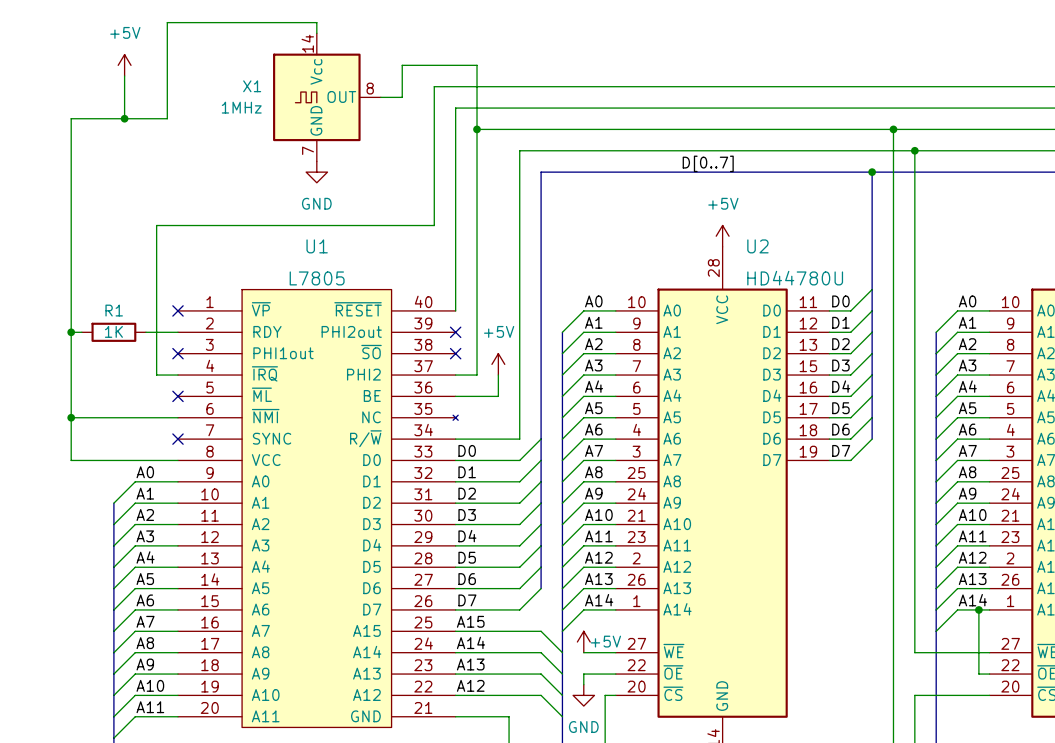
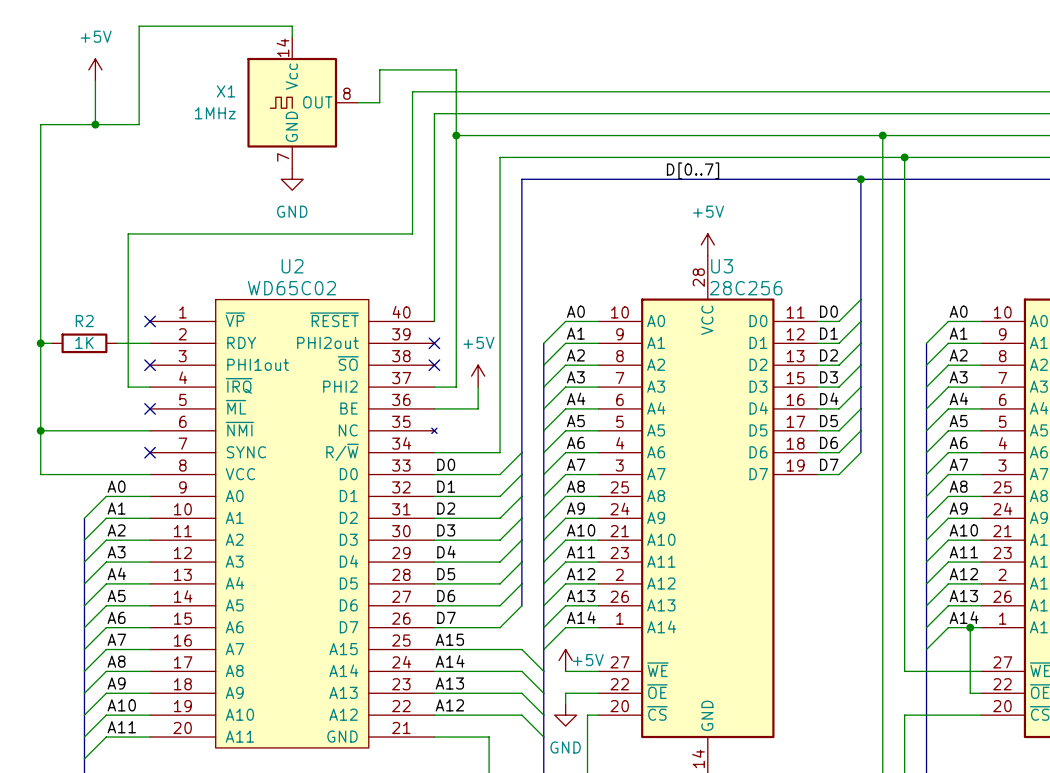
U1 name: U1 (317, 246) -> U2 (292, 266)
U2 name: U2 (757, 246) -> U3 (722, 266)
U1 value: L7805 (317, 278) -> WD65C02 (291, 288)
U2 value: HD44780U (795, 278) -> 28C256 (746, 288)
R1 name: R1 (114, 310) -> R2 (84, 321)

